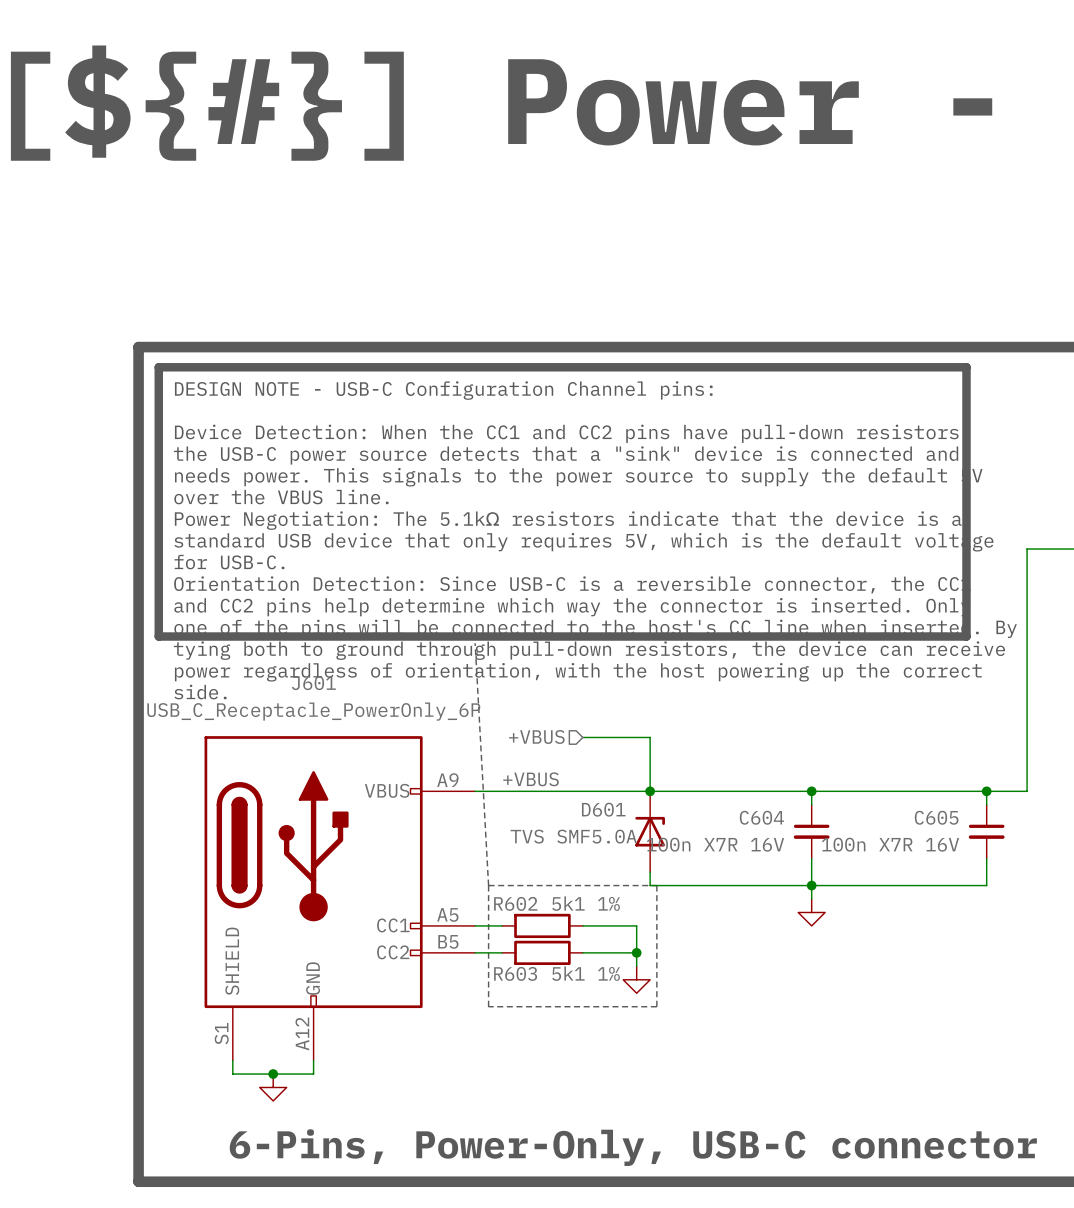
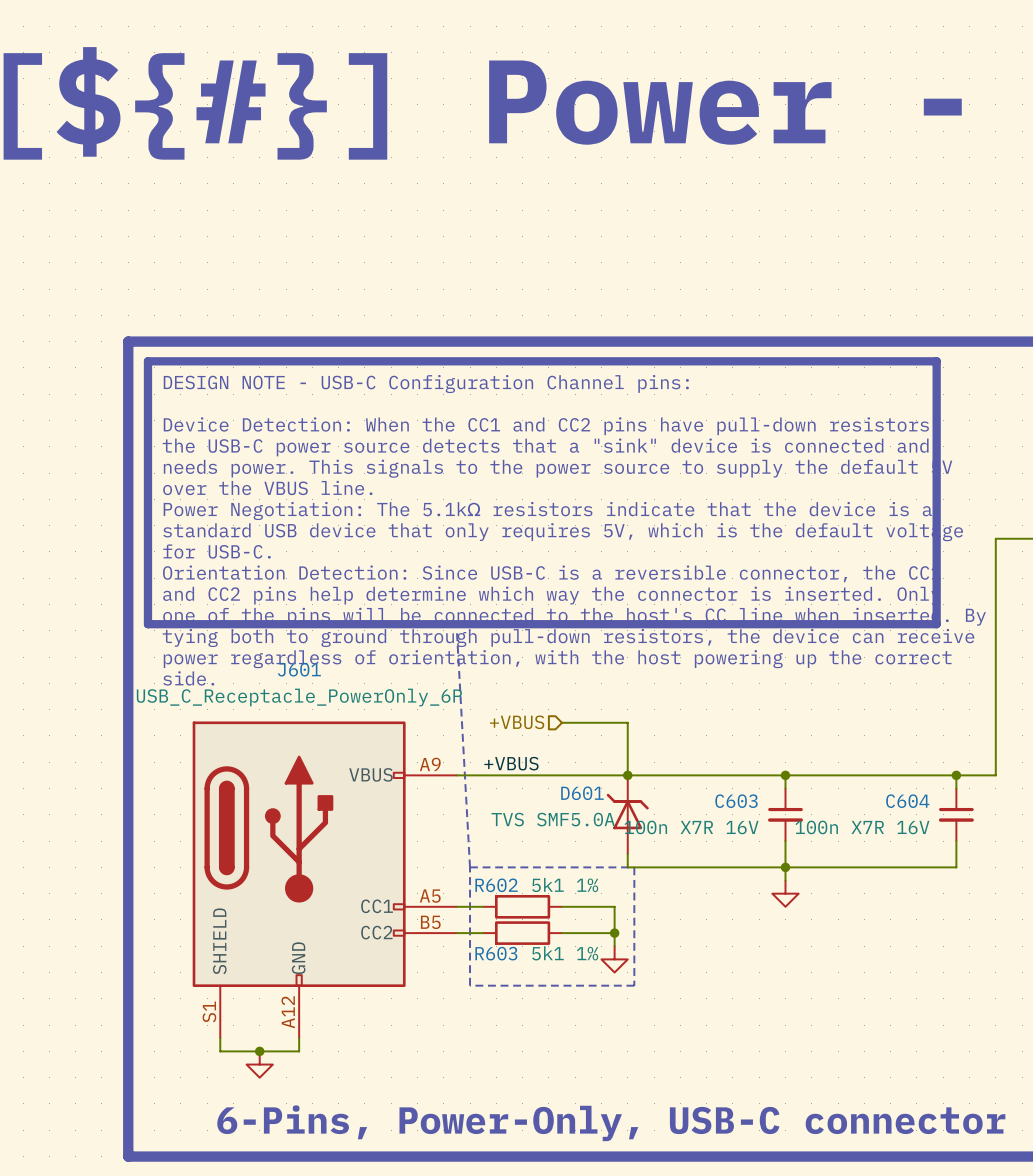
D601 symbol: [635, 791, 665, 873] -> [606, 775, 649, 855]
C604 name: C604 (761, 817) -> C603 (736, 801)
C605 name: C605 (936, 817) -> C604 (907, 801)

